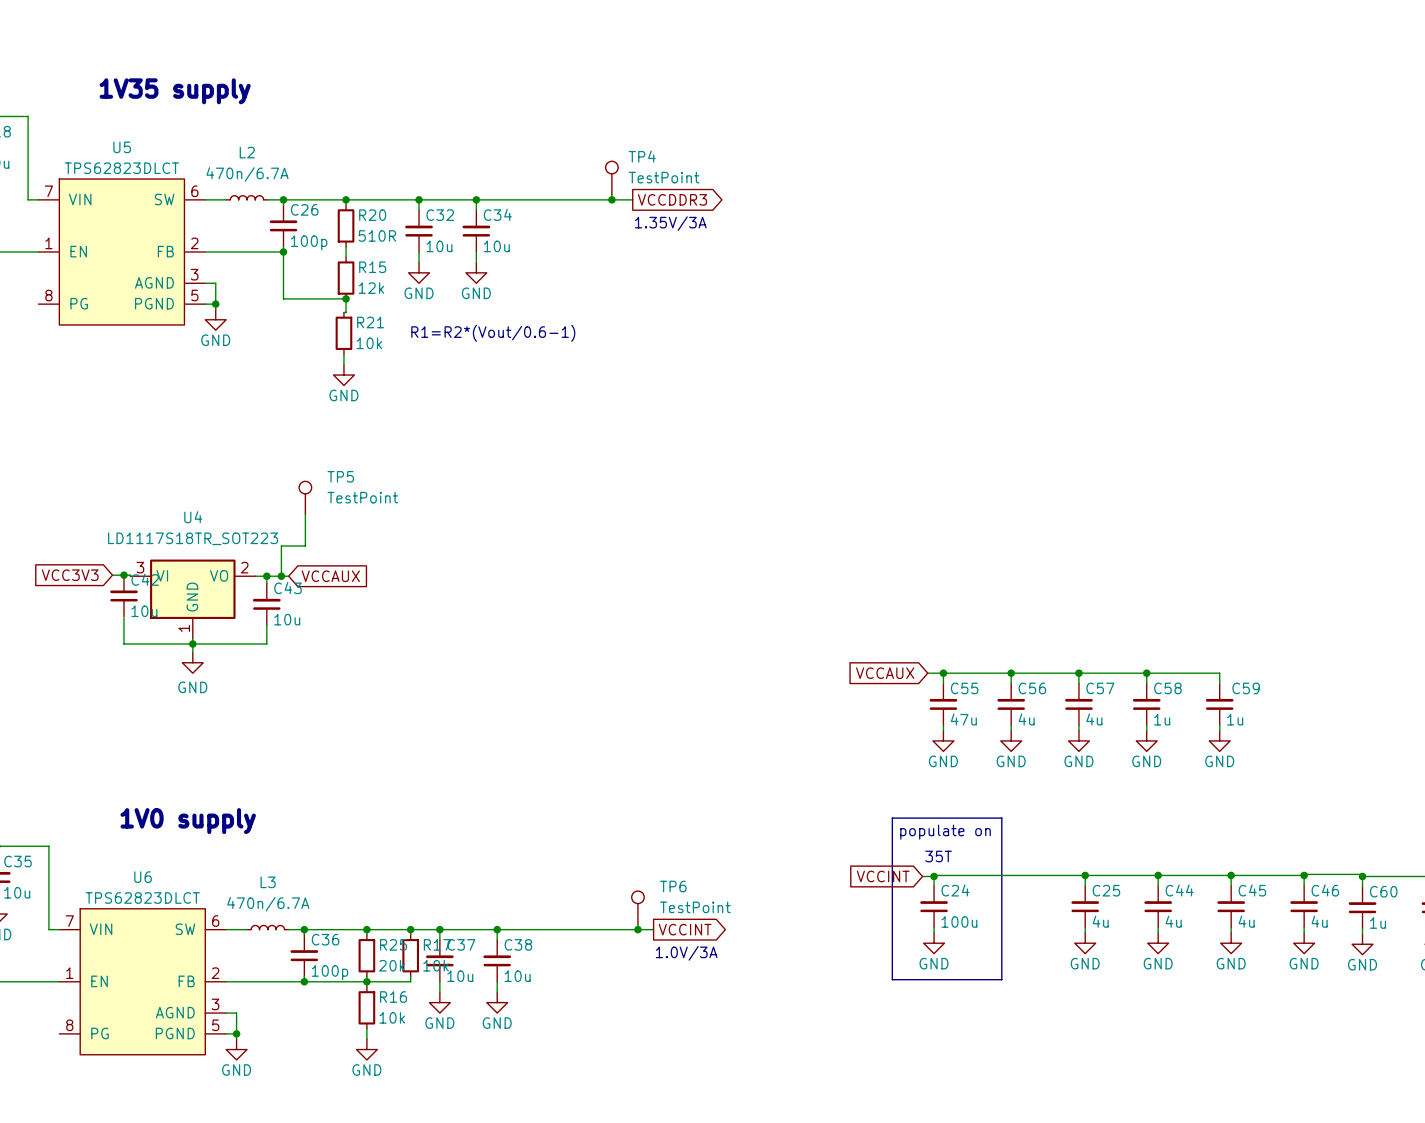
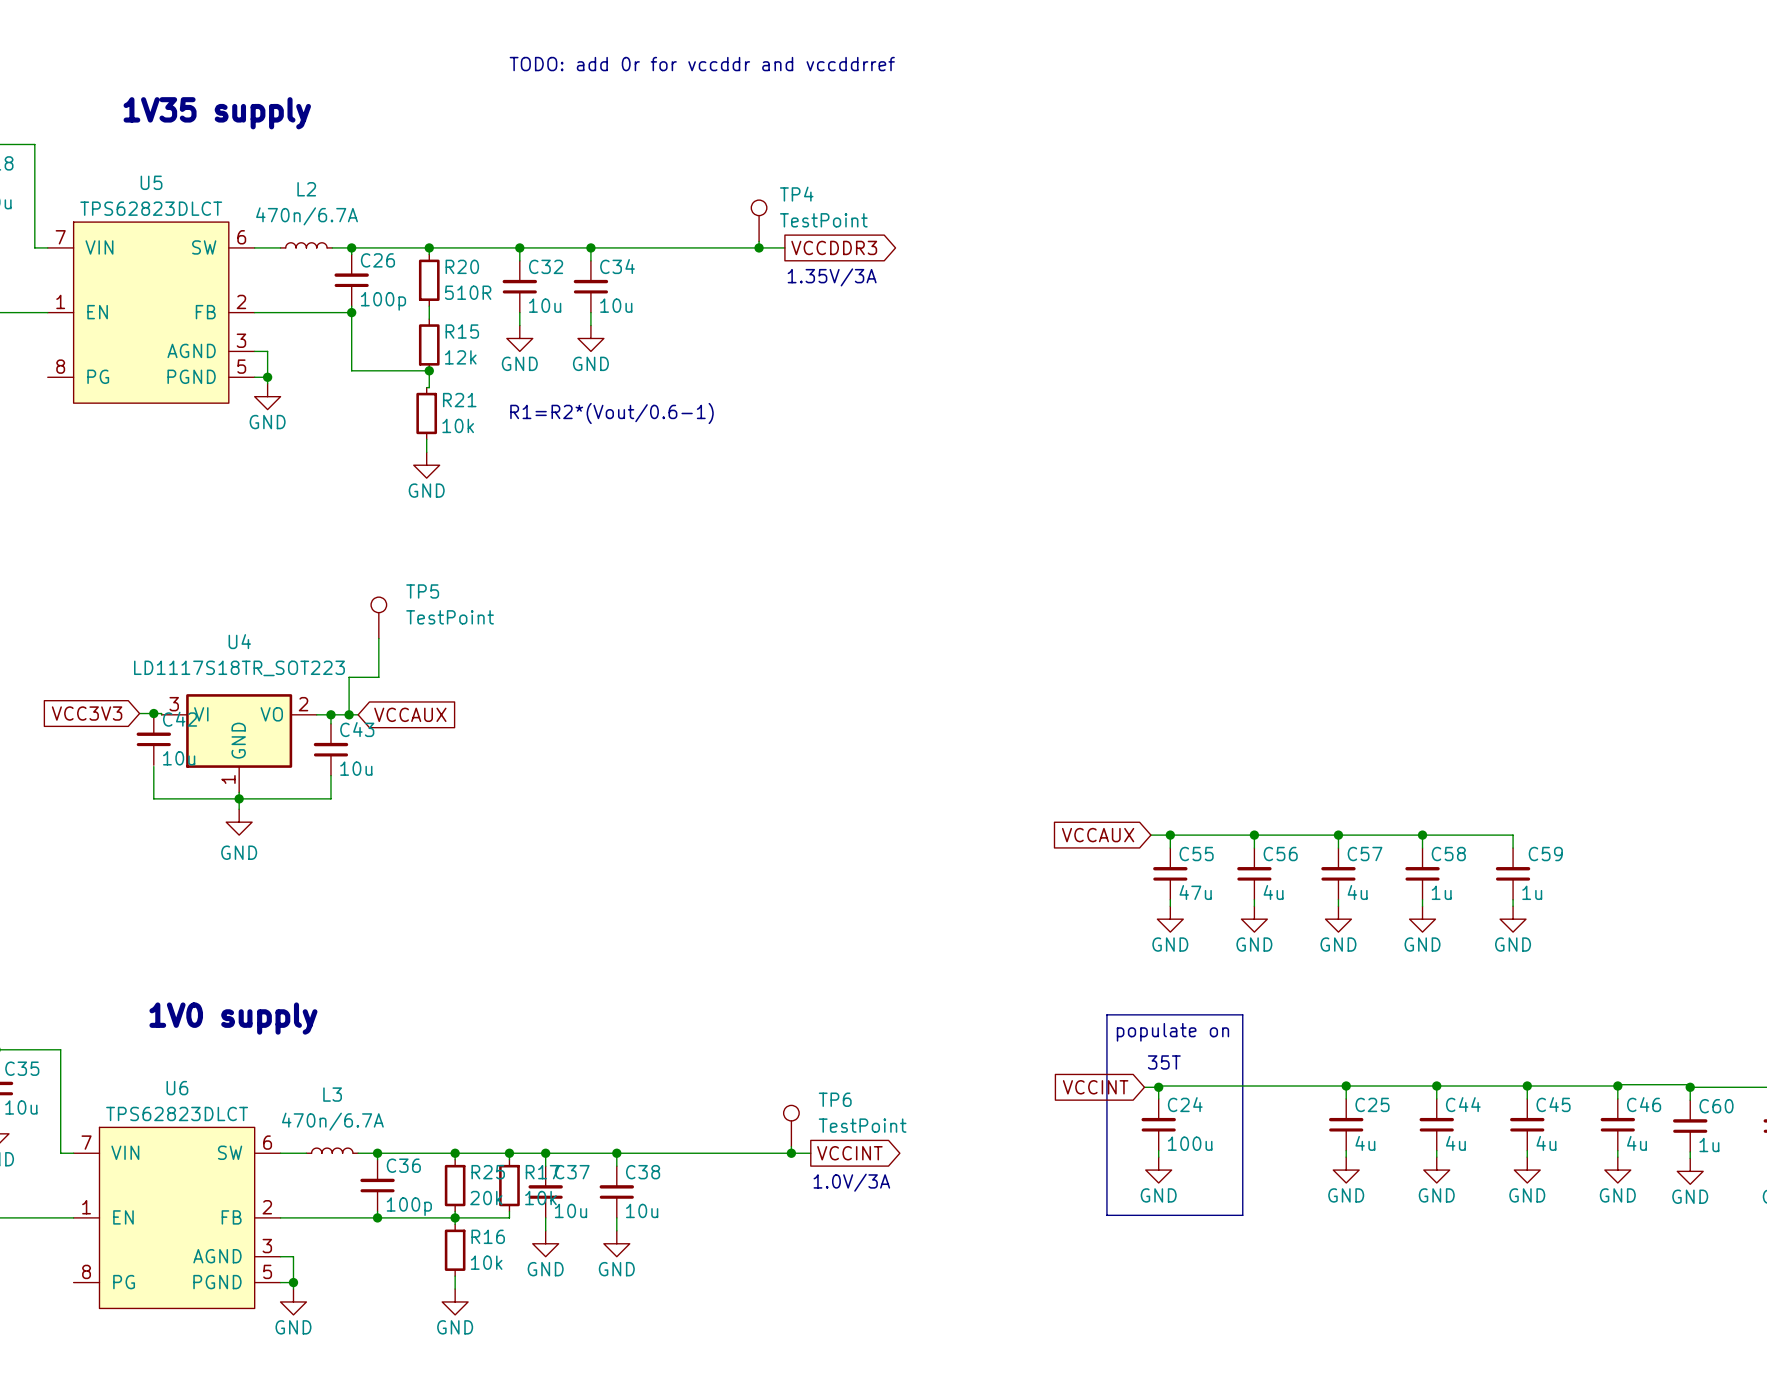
text: none -> TODO: add 0r for vccddr and vccddrref (702, 64)

